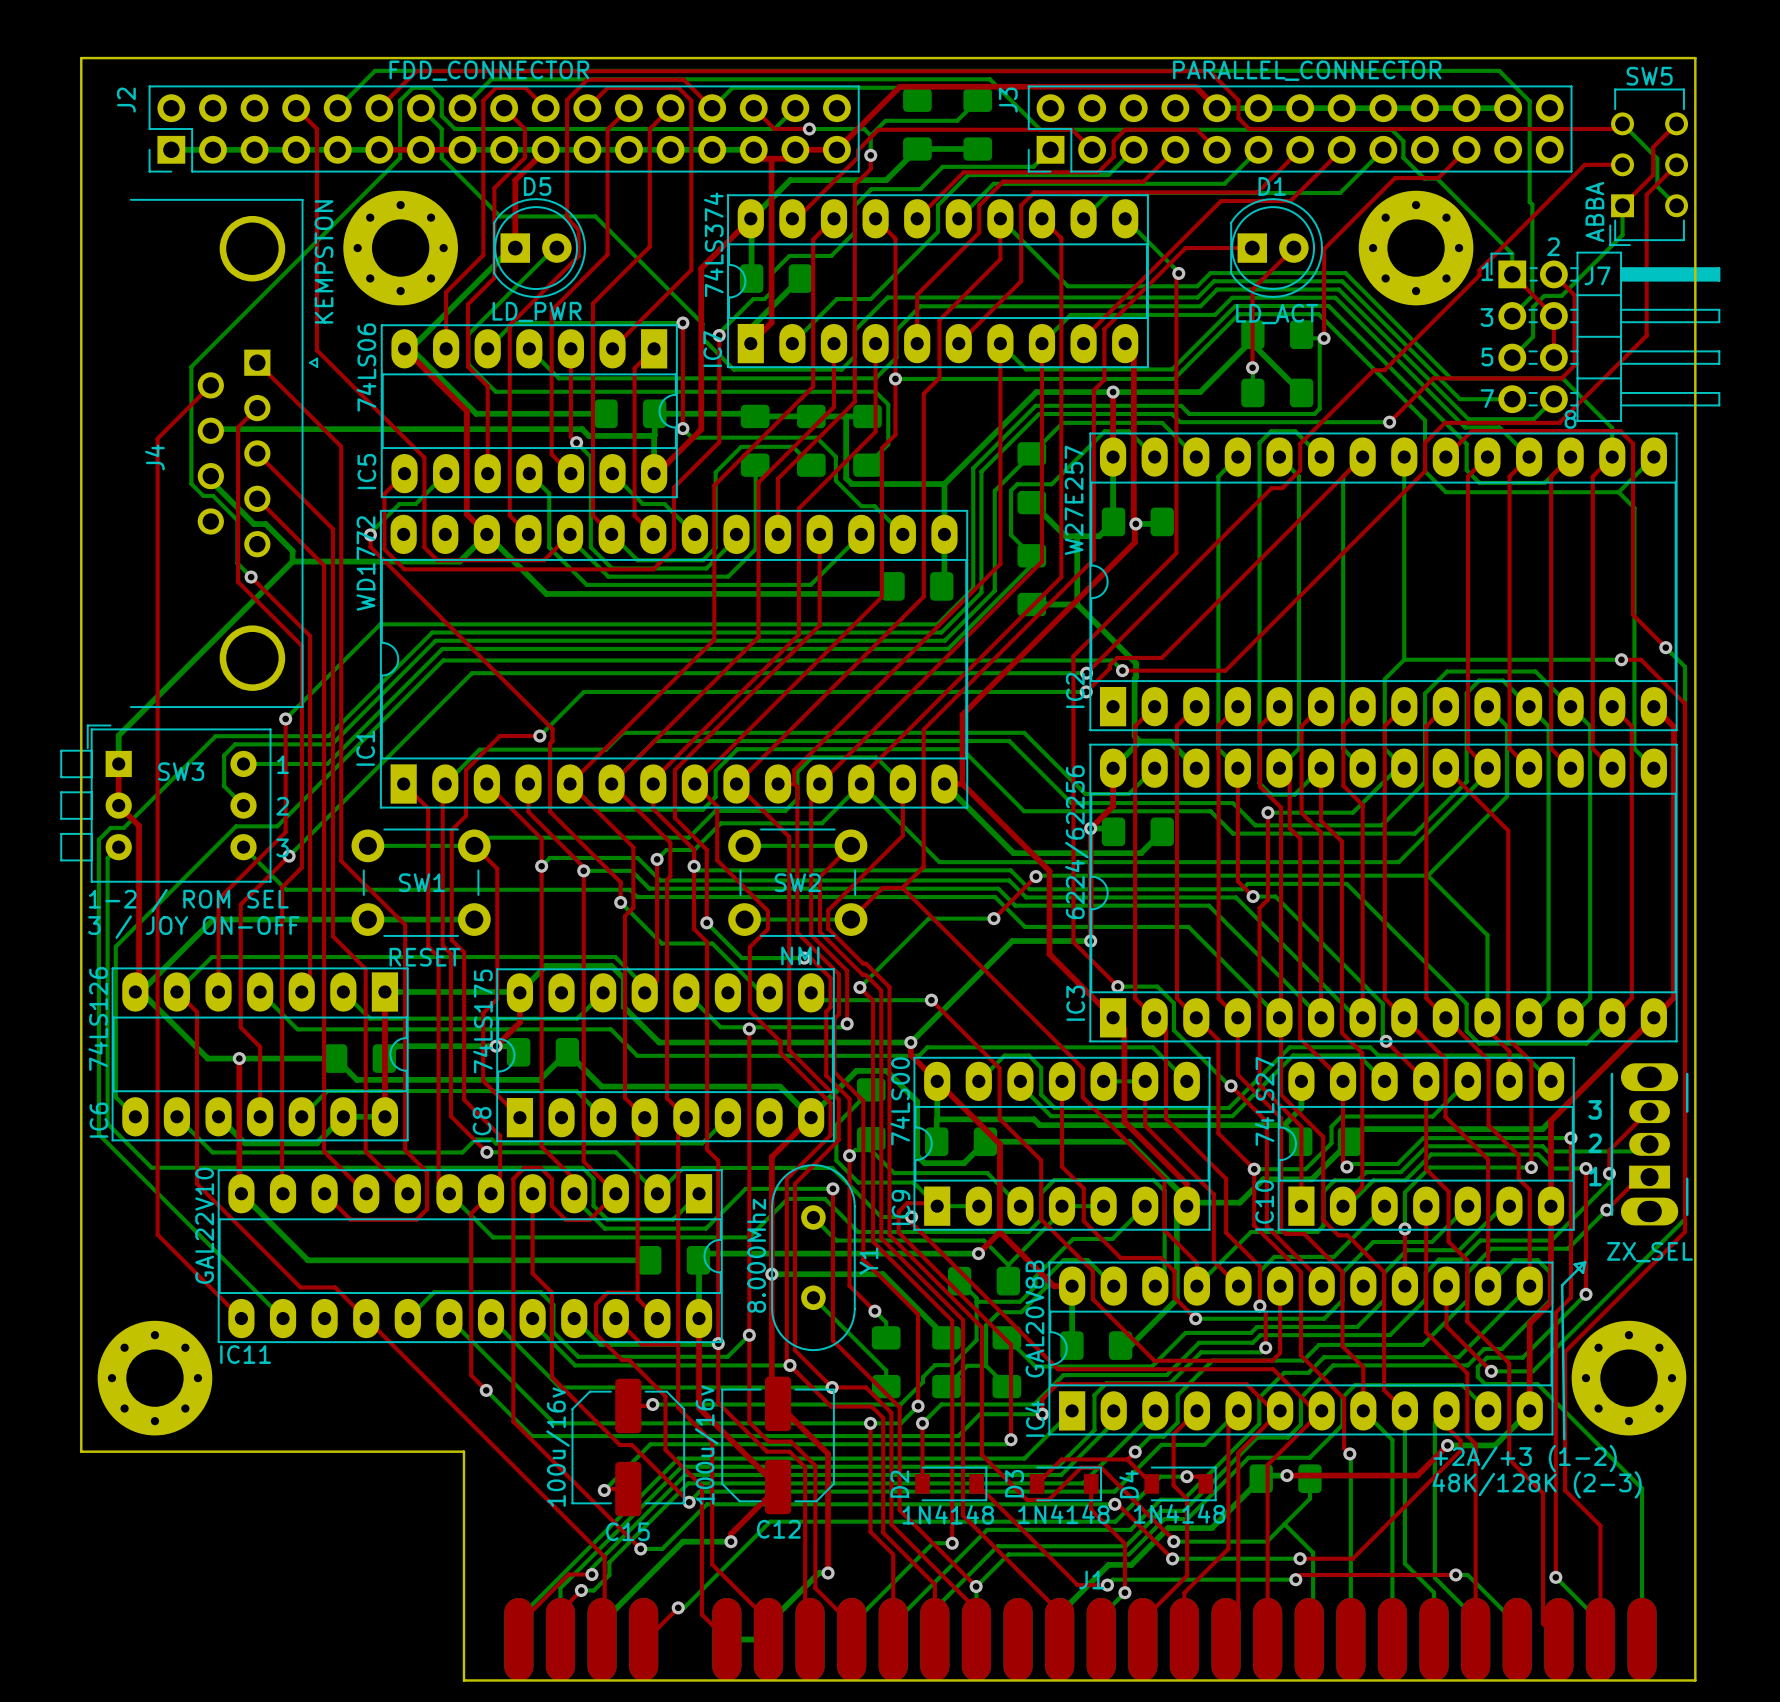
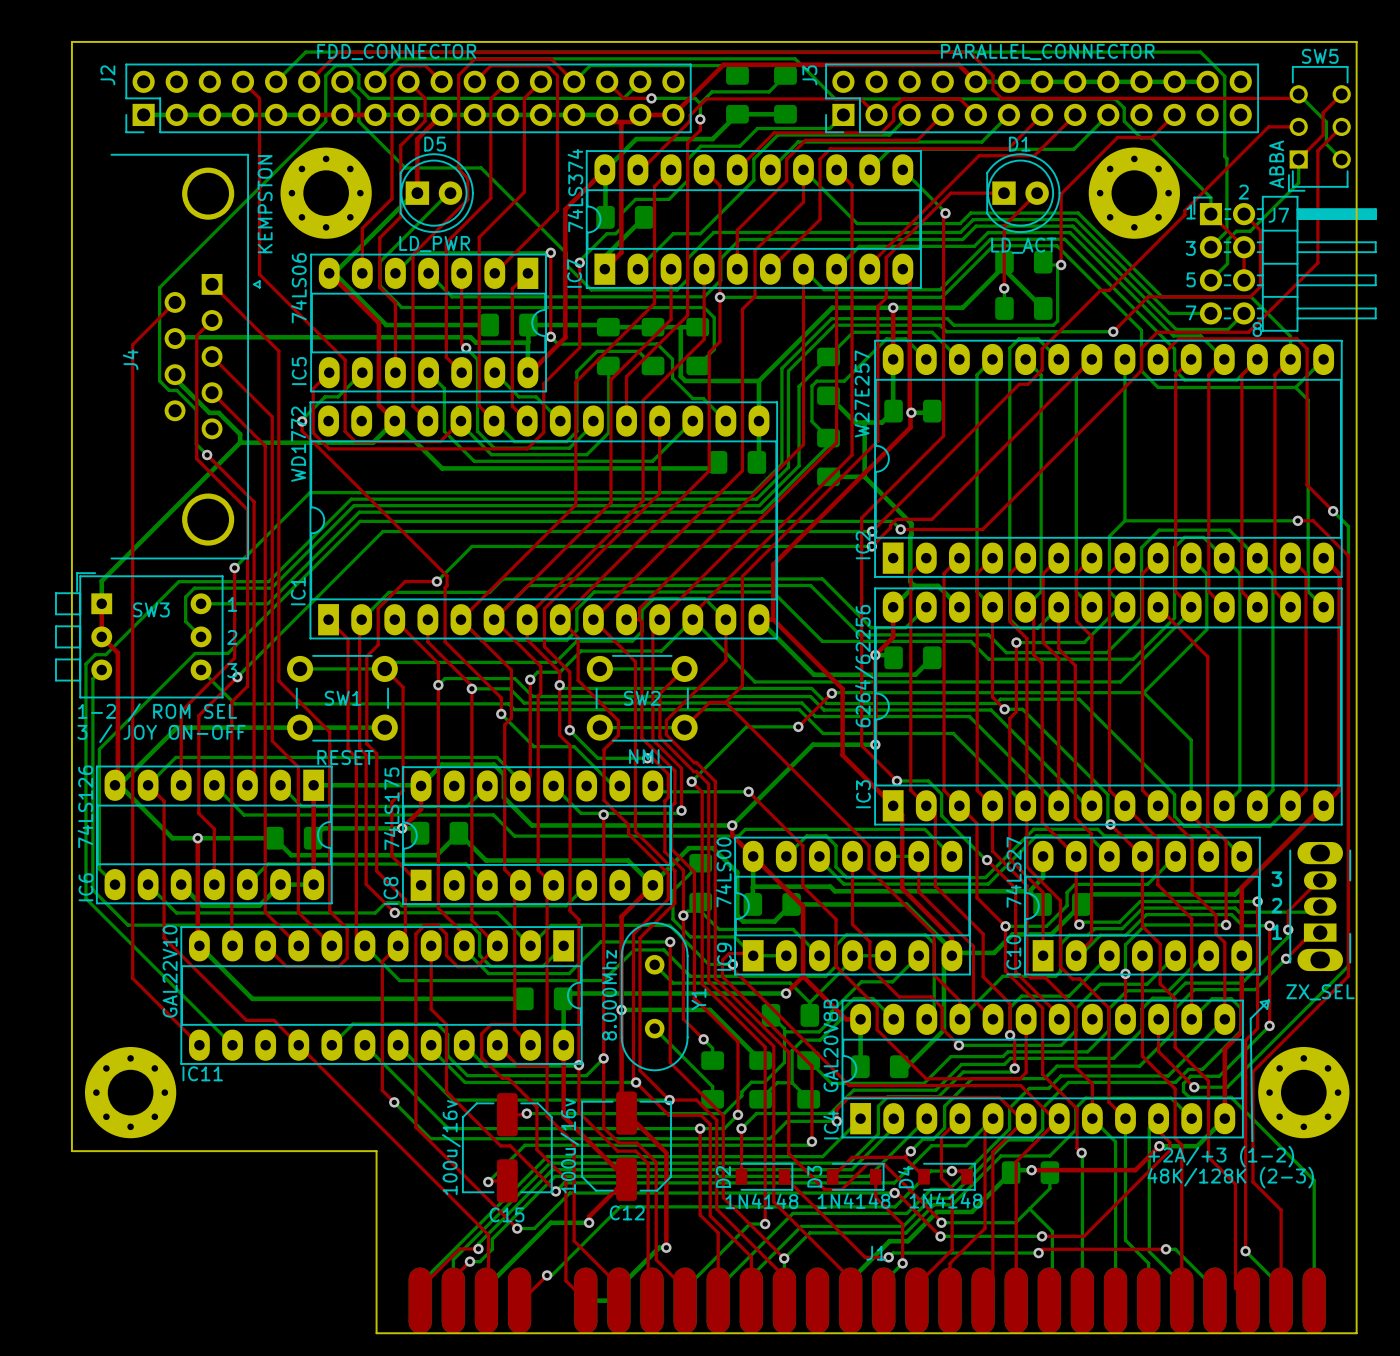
IC3 value: 6224/62256 (1076, 842) -> 6264/62256 (864, 666)

